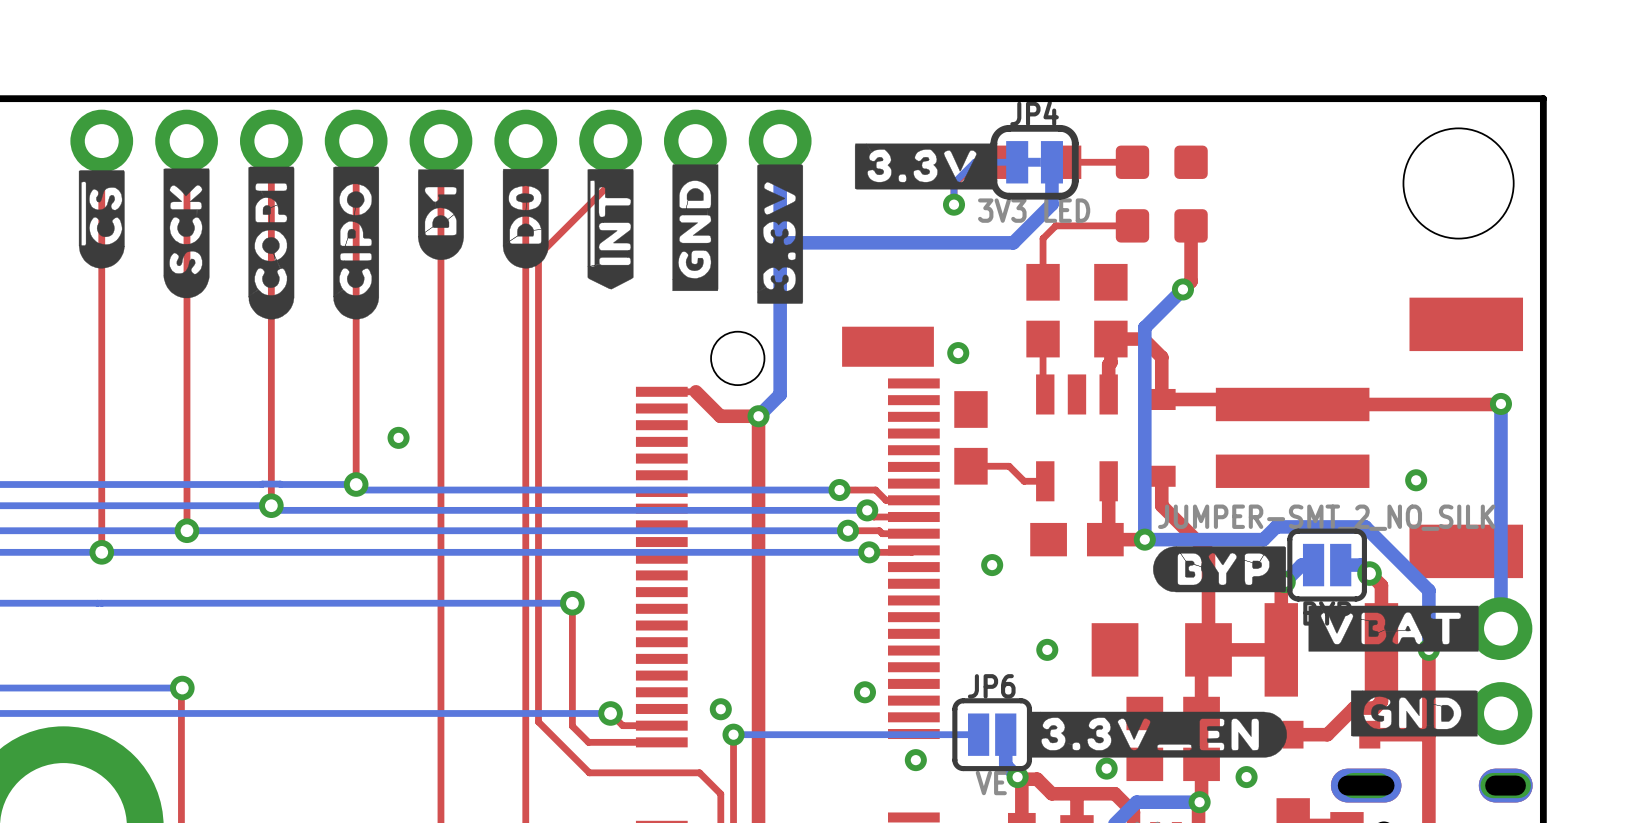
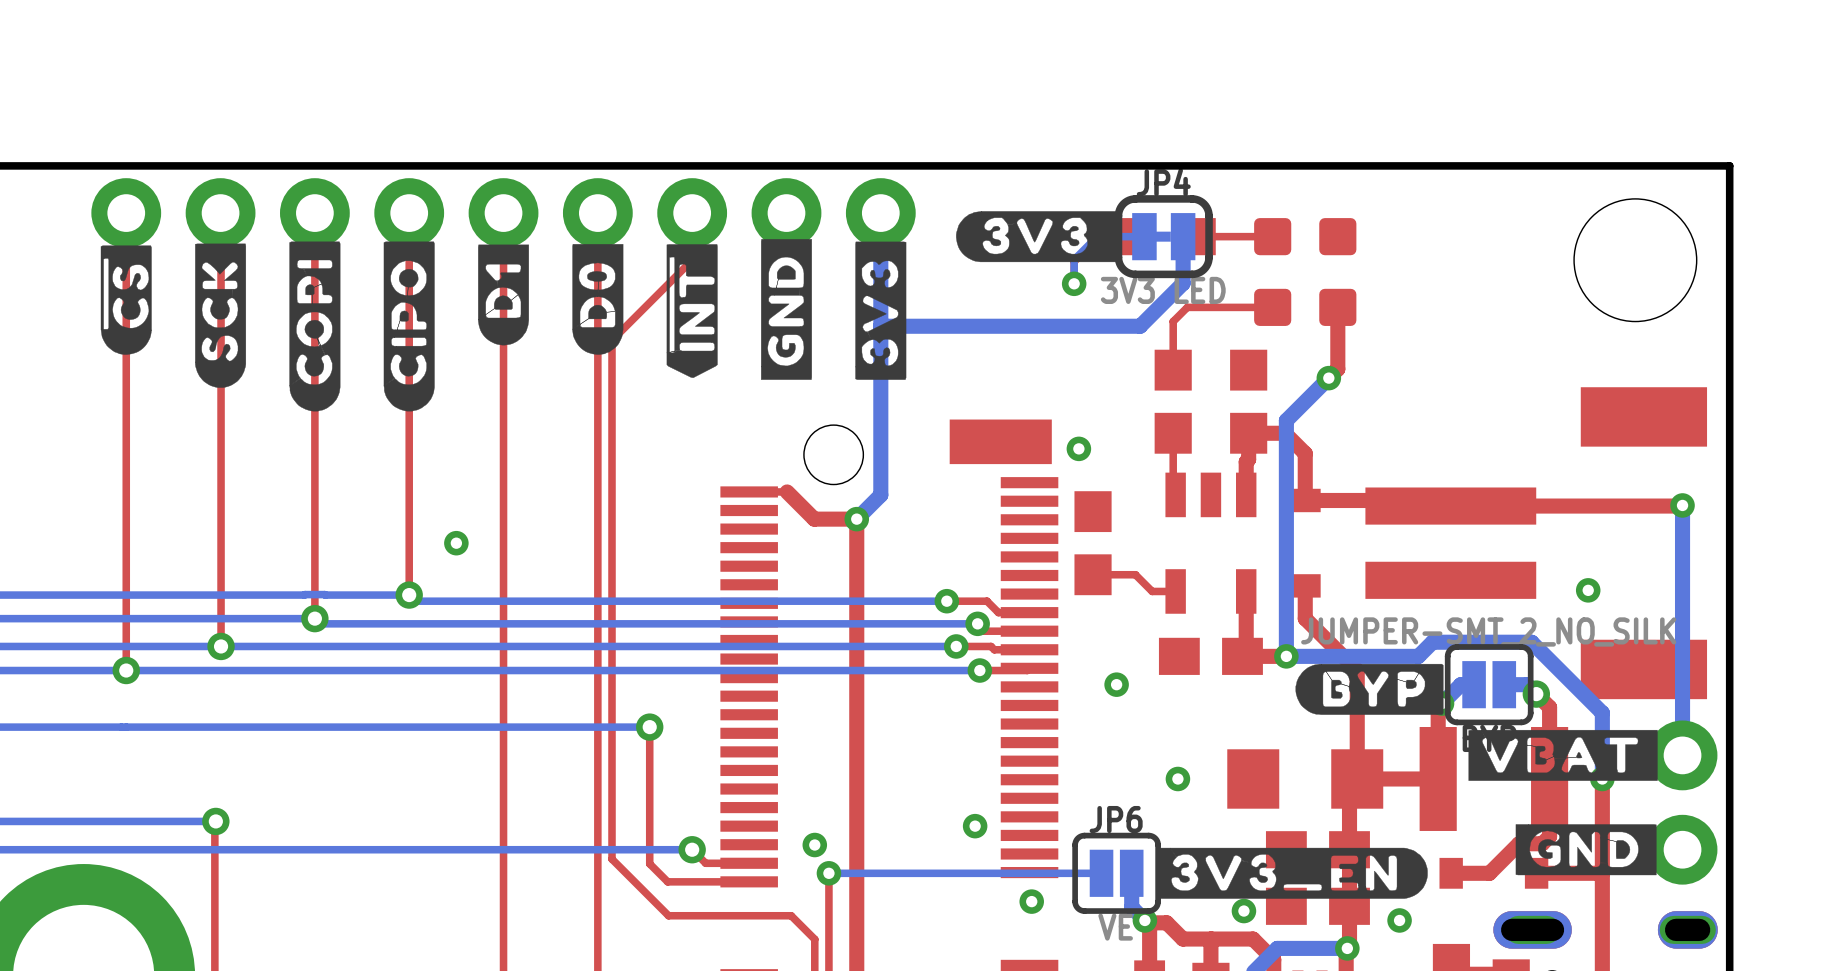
drawing shape: [854, 143, 995, 190] -> [956, 211, 1120, 263]
drawing shape: [757, 164, 804, 304] -> [855, 241, 907, 380]
drawing shape: [1028, 711, 1287, 758] -> [1157, 847, 1428, 899]

